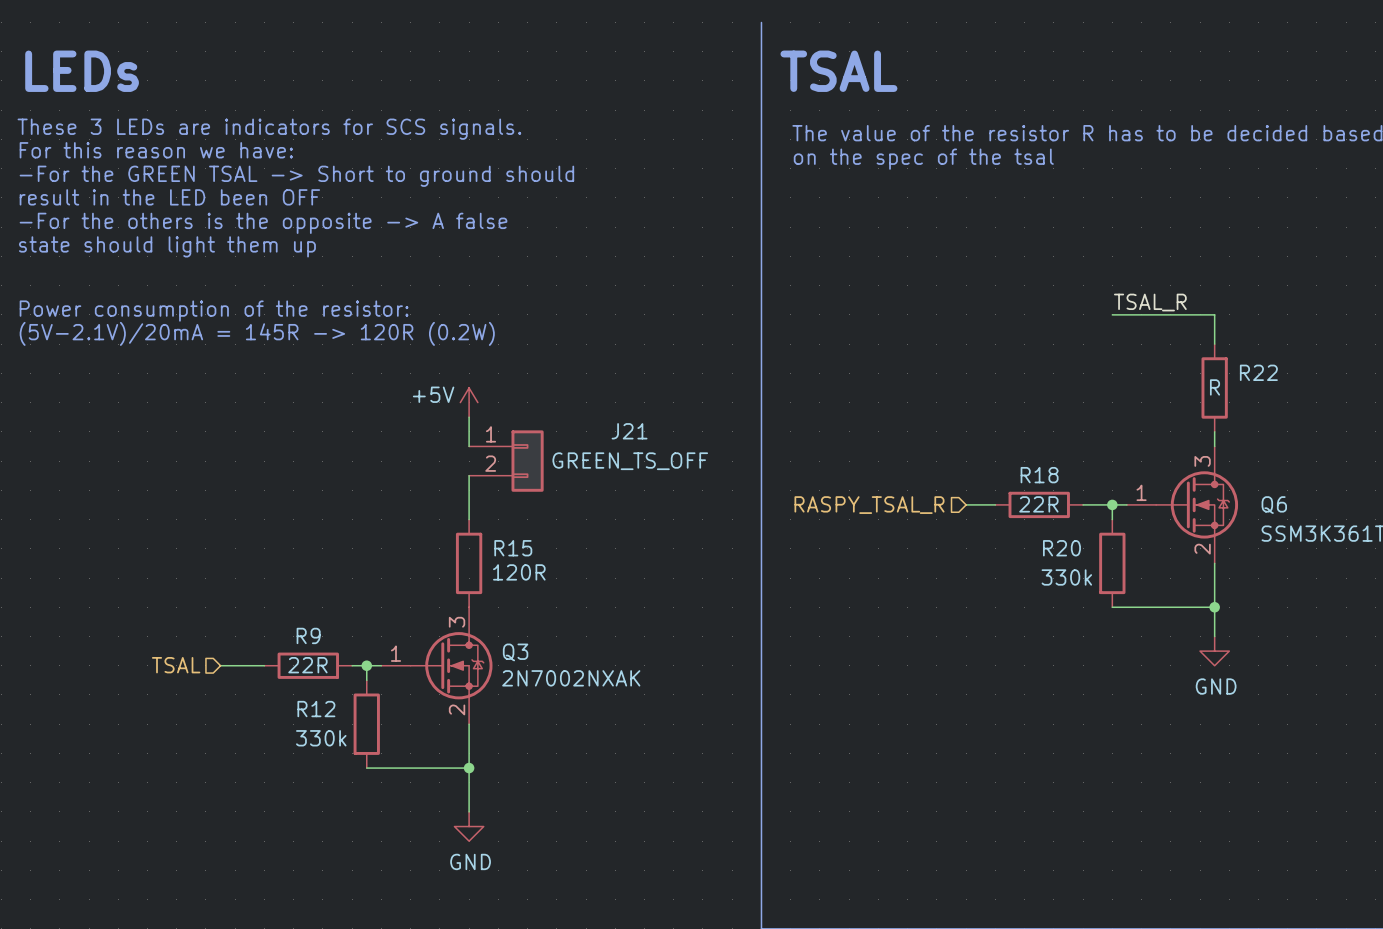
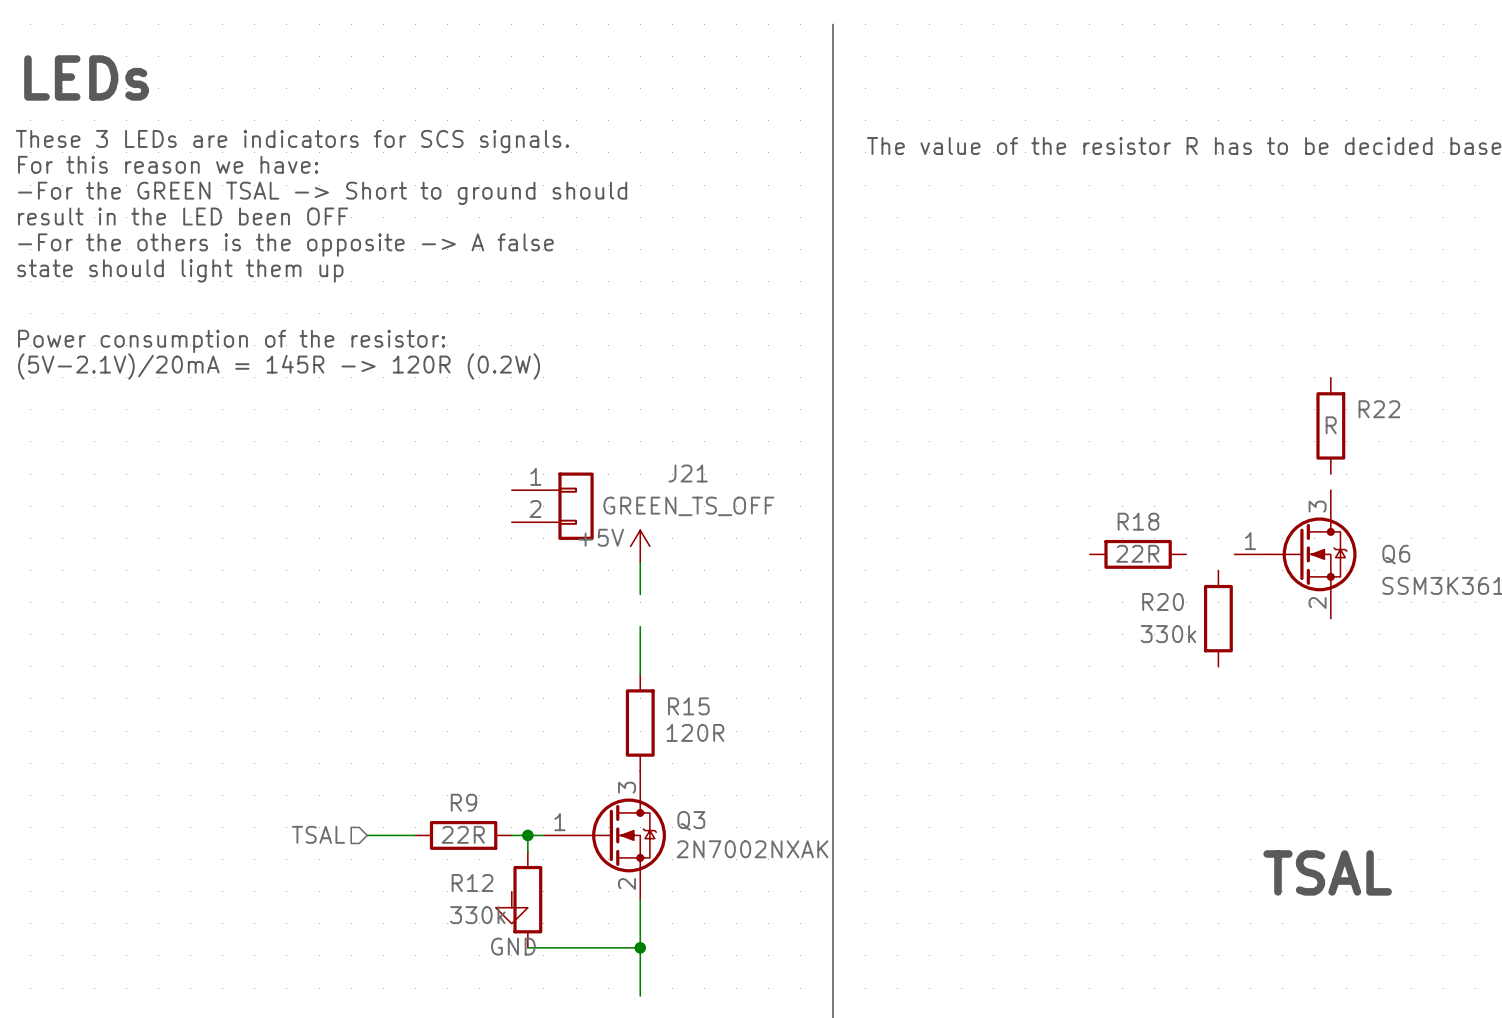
text: TSAL (838, 71) -> none
text: on the spec of the tsal (923, 159) -> none
label: TSAL_R (1150, 302) -> none
wire: (1112, 314) (1214, 314) (1214, 344) -> none
power symbol position: +5V (469, 402) -> +5V (640, 546)
wire: (469, 417) (469, 446) -> (640, 562) (640, 594)
wire: (1214, 431) (1214, 446) -> none
wire: (469, 475) (469, 519) -> (640, 626) (640, 674)
wire: (966, 504) (995, 504) -> none
wire: (1083, 504) (1126, 504) -> none
wire: (1112, 504) (1112, 519) -> none
junction: (1112, 504) -> none
hierarchical label: RASPY_TSAL_R (869, 505) -> none
R15 position: (469, 563) -> (640, 723)
wire: (1214, 563) (1214, 636) -> none
wire: (1112, 607) (1214, 607) -> none
junction: (1214, 607) -> none
power symbol: GND (1214, 651) -> none
hierarchical label position: TSAL (176, 665) -> TSAL (318, 834)
wire: (220, 665) (264, 665) -> (367, 835) (415, 835)
R9 position: (308, 665) -> (463, 835)
wire: (352, 665) (381, 665) -> (511, 835) (543, 835)
wire: (366, 665) (366, 680) -> (527, 835) (527, 851)
junction: (366, 665) -> none
Q3 position: (436, 665) -> (604, 835)
R12 position: (366, 724) -> (527, 899)
wire: (469, 724) (469, 811) -> (640, 899) (640, 996)
wire: (366, 768) (469, 768) -> (527, 947) (640, 947)
junction position: (469, 768) -> (527, 835)
text: none -> TSAL (1327, 872)
junction: none -> (640, 947)

